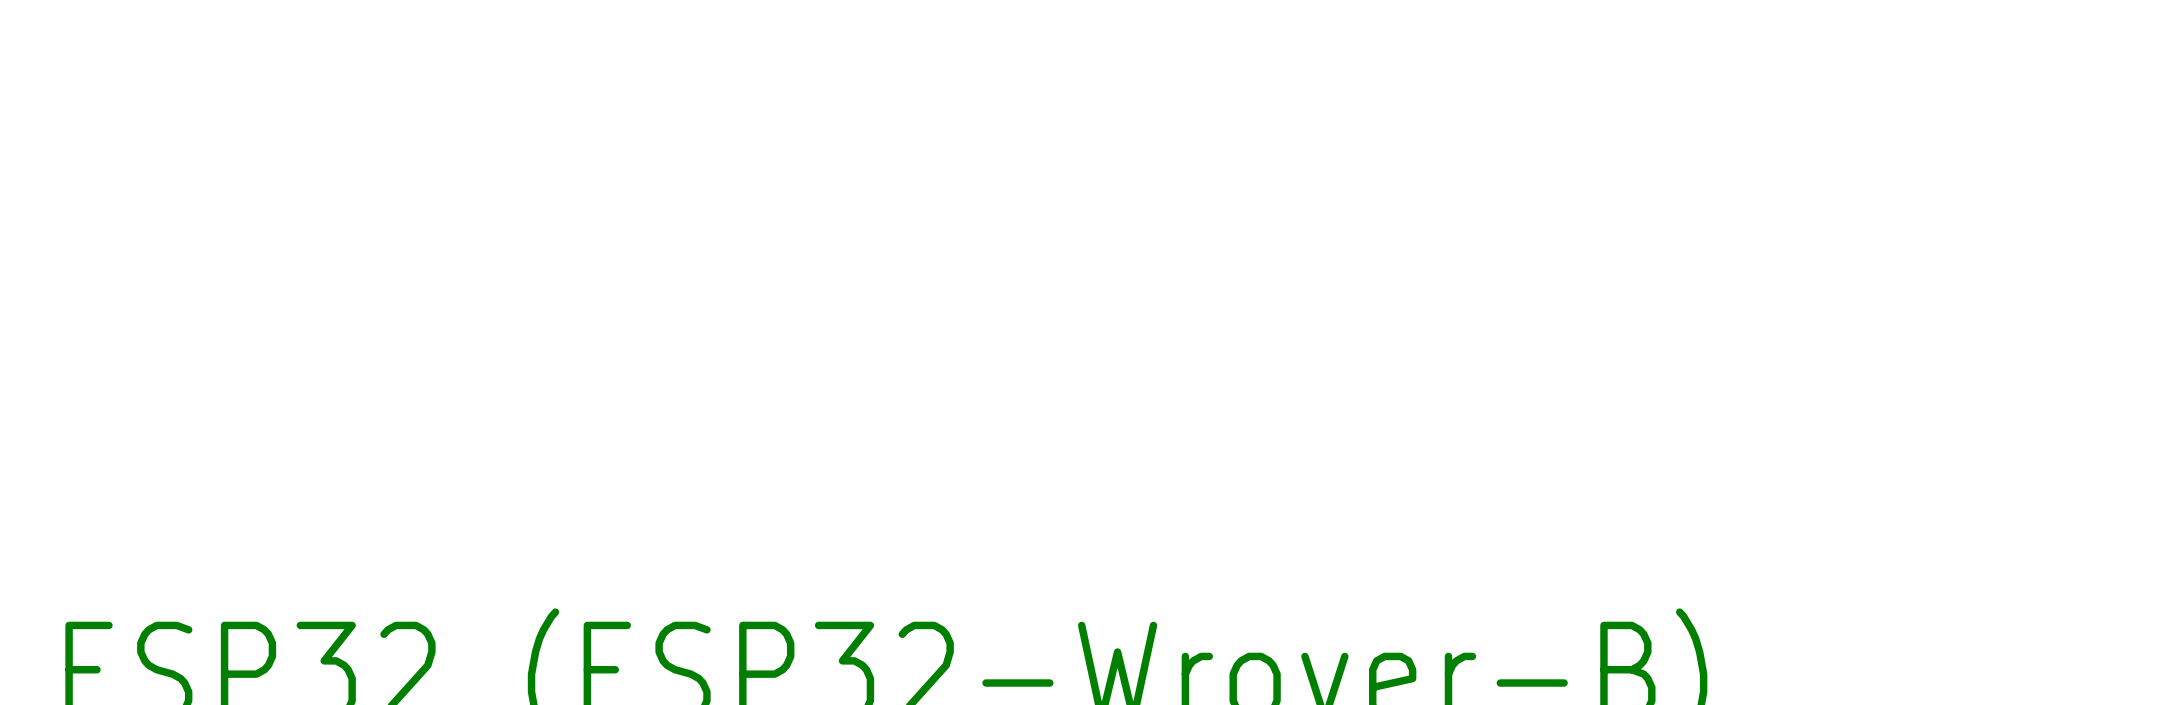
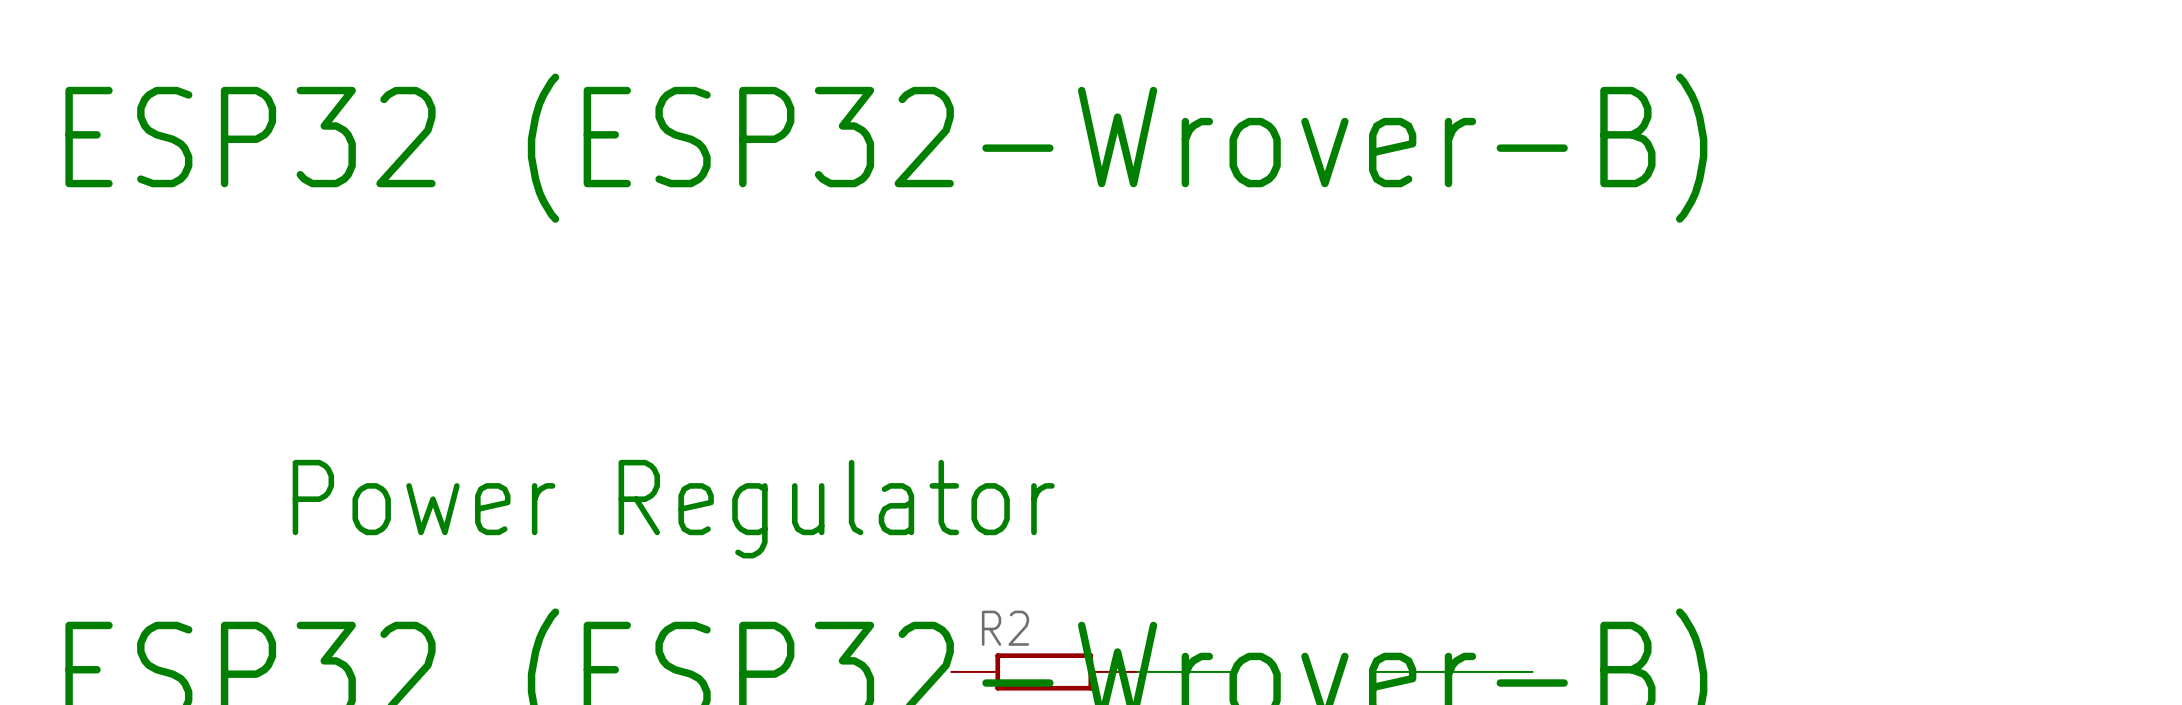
text: none -> ESP32 (ESP32-Wrover-B) (886, 148)
text: none -> Power Regulator (673, 509)
R2: none -> (1044, 671)
wire: none -> (1137, 671) (1230, 671)
wire: none -> (1369, 671) (1532, 671)

